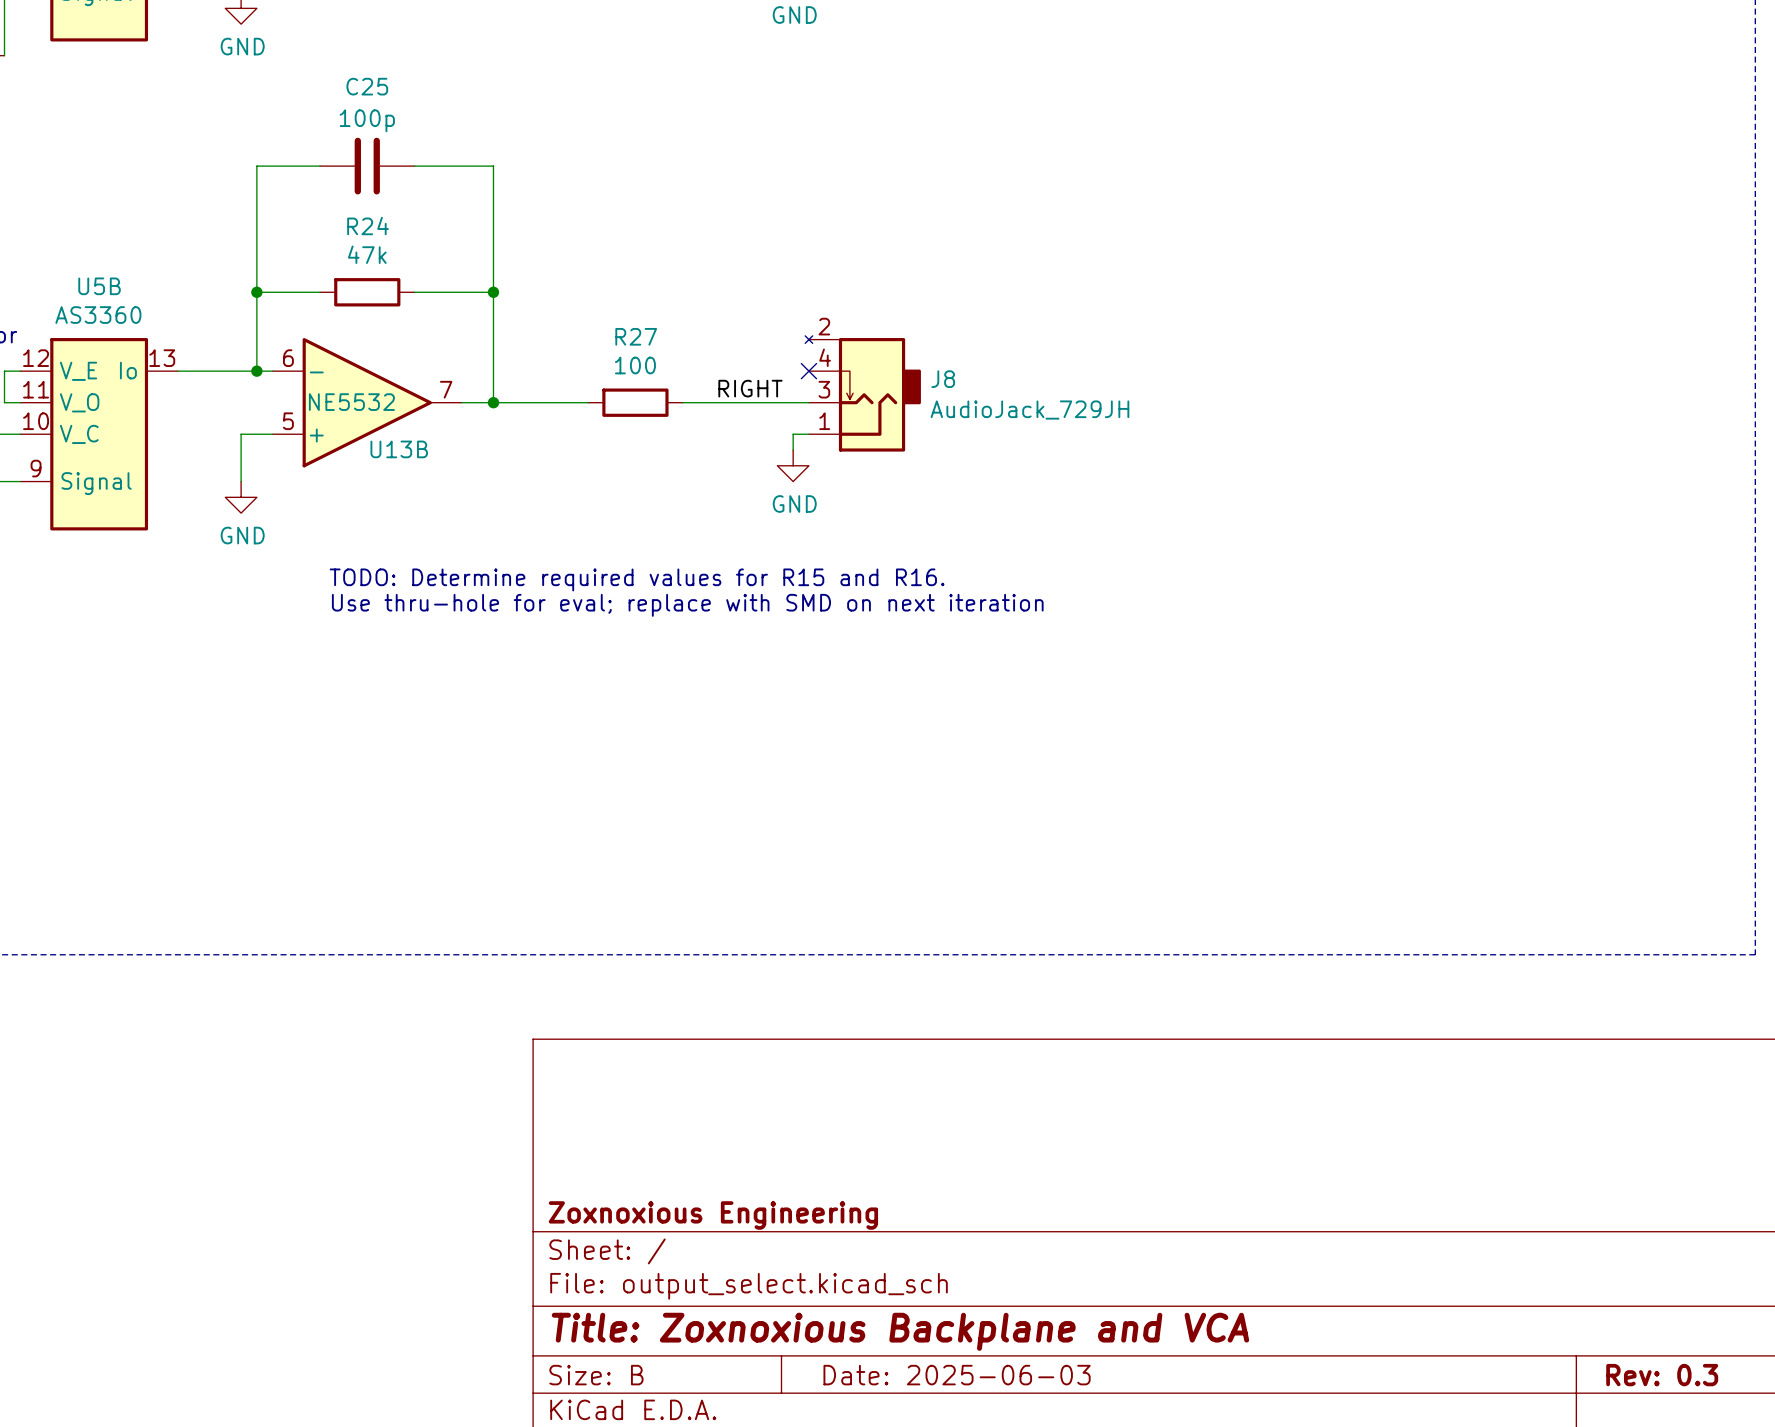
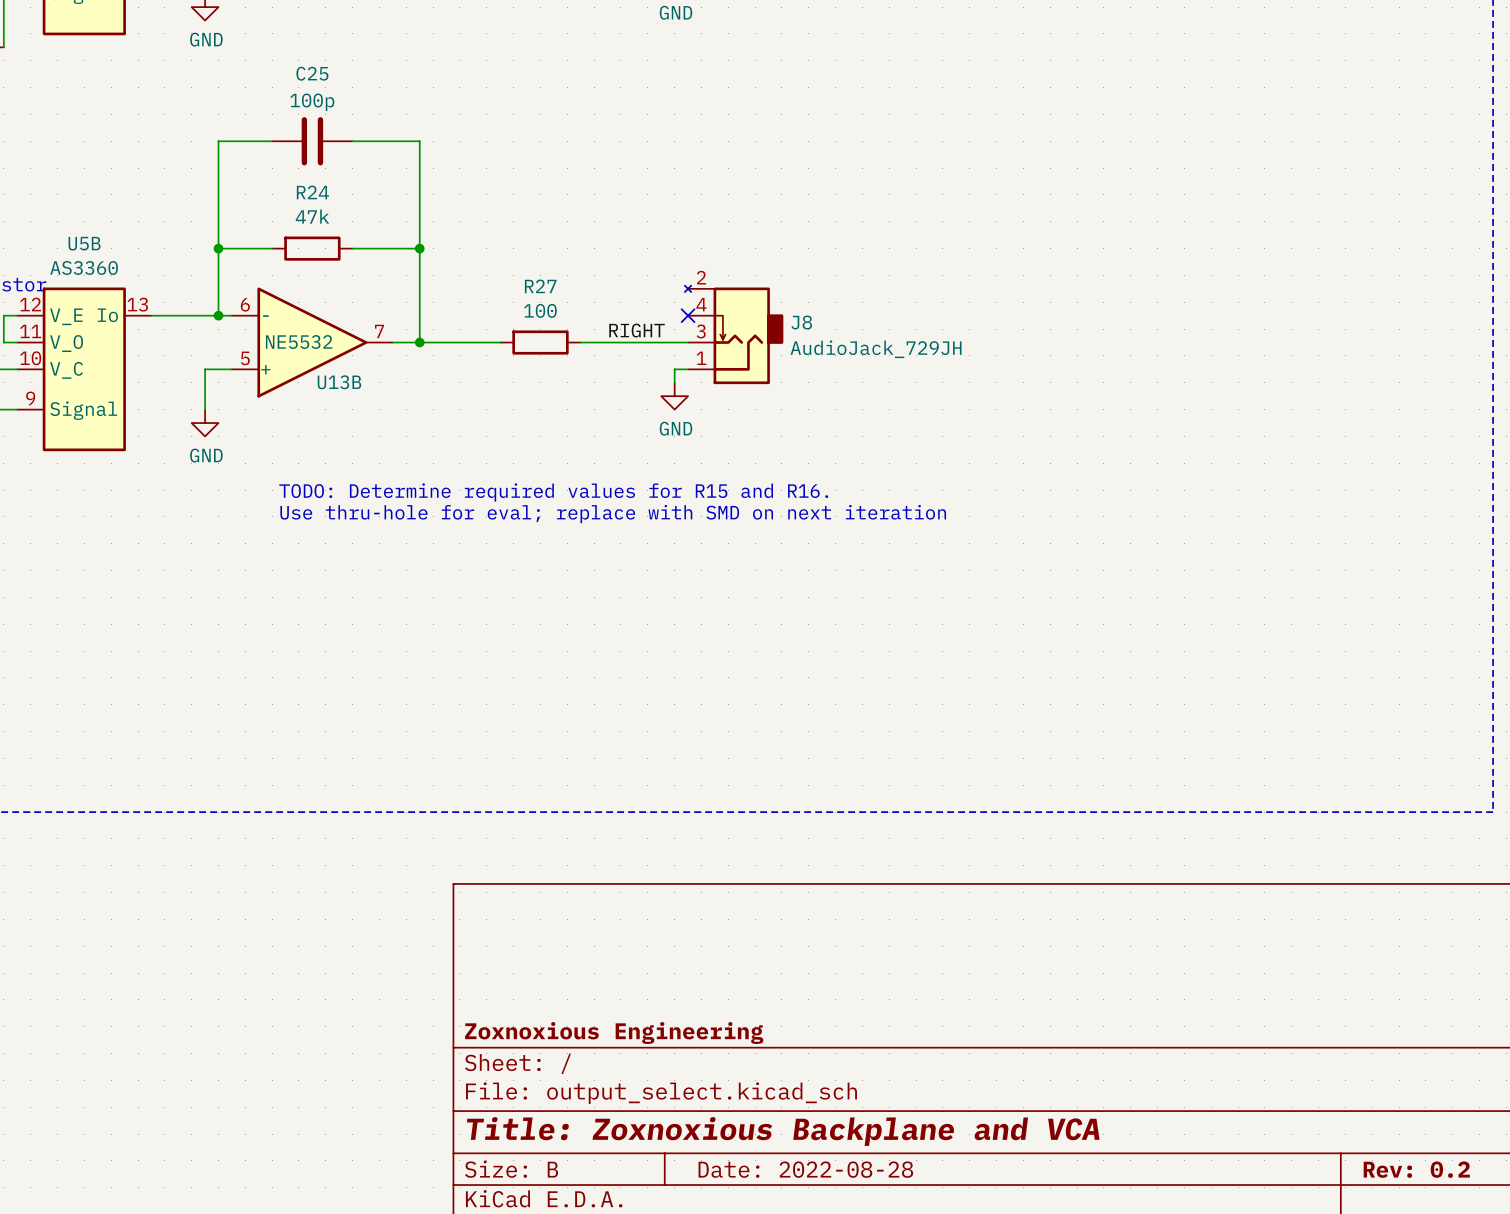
title block: Date: 2025-06-03 (957, 1375) -> Date: 2022-08-28 (805, 1169)
title block: Rev: 0.3 (1662, 1375) -> Rev: 0.2 (1416, 1169)

